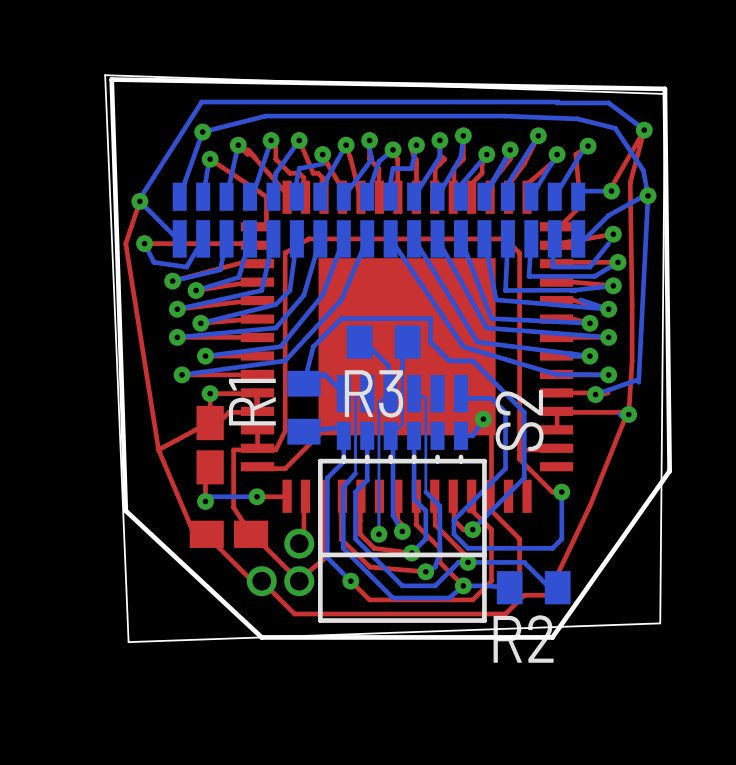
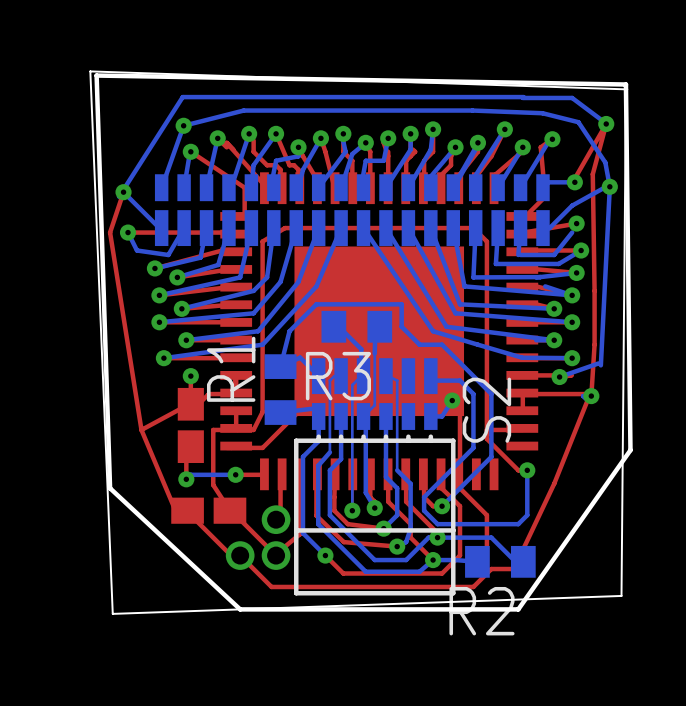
top track: (257, 393) (210, 393) -> none

